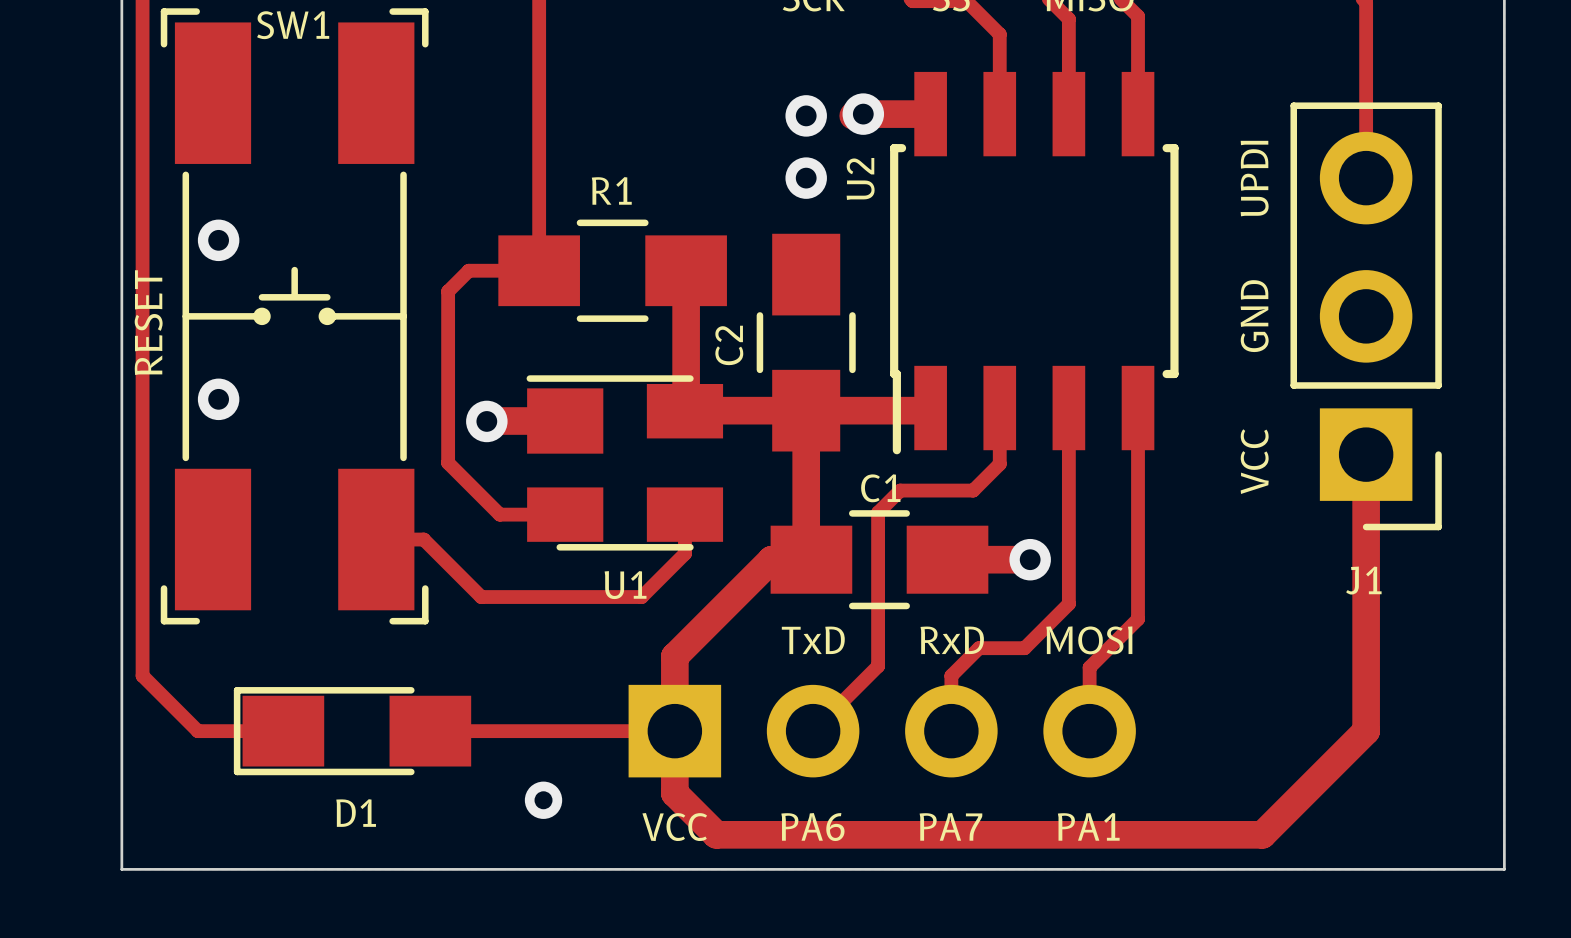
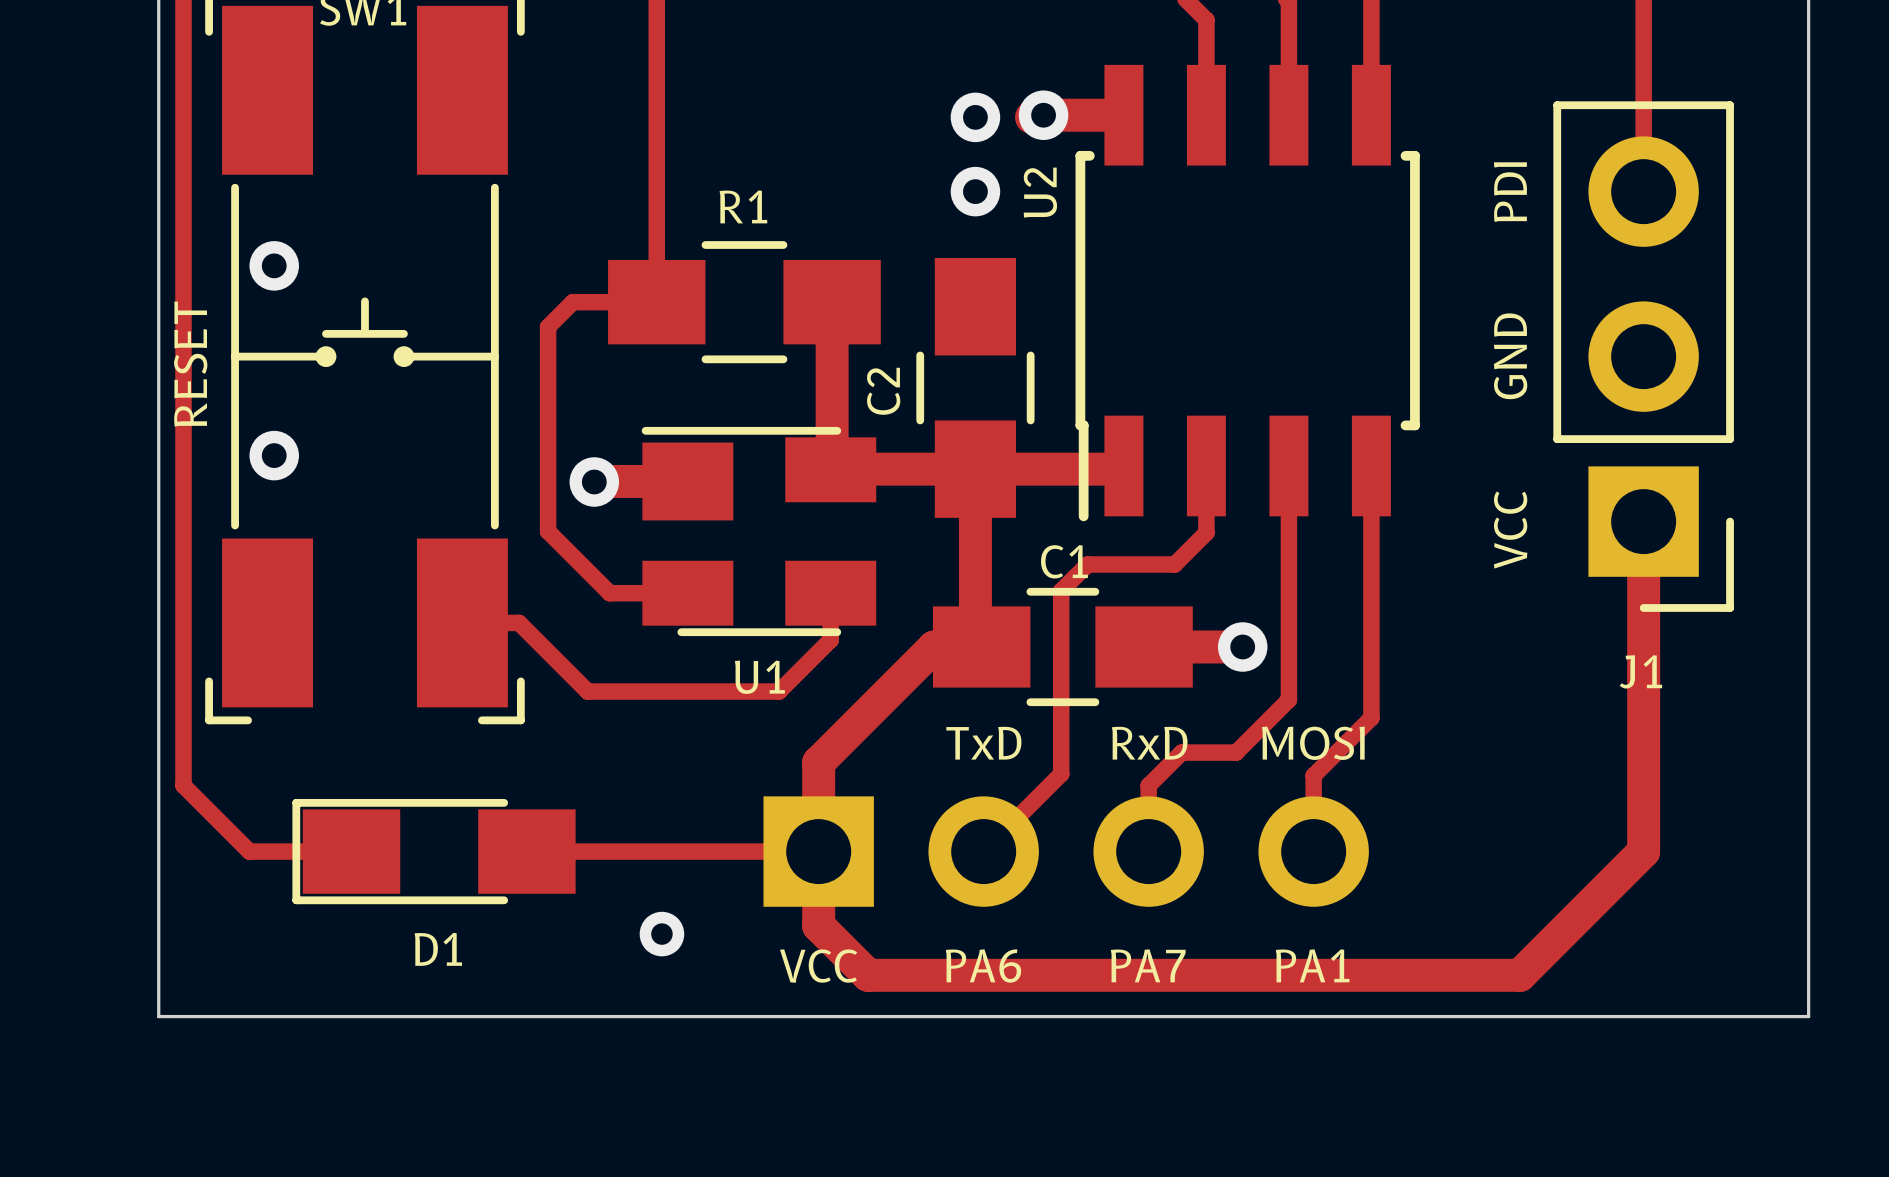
text: UPDI (1254, 178) -> PDI (1510, 192)

